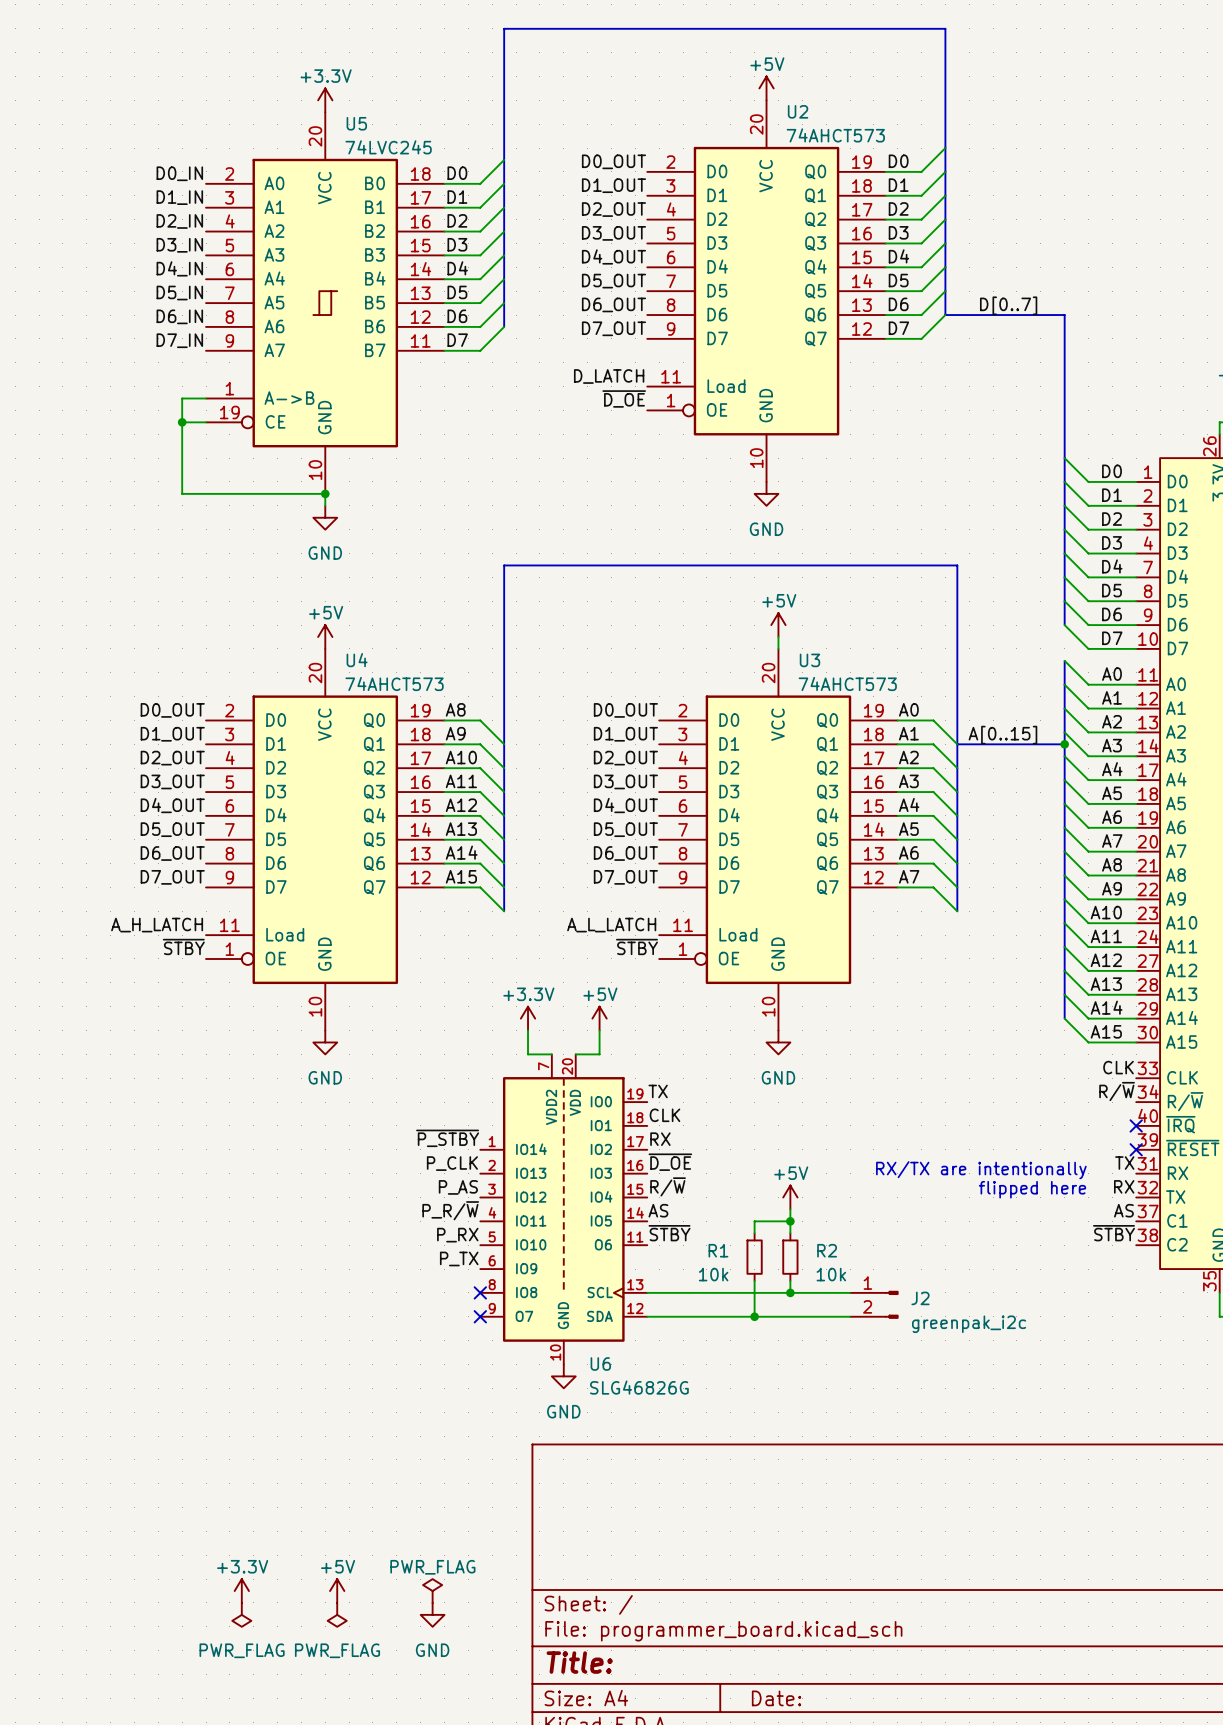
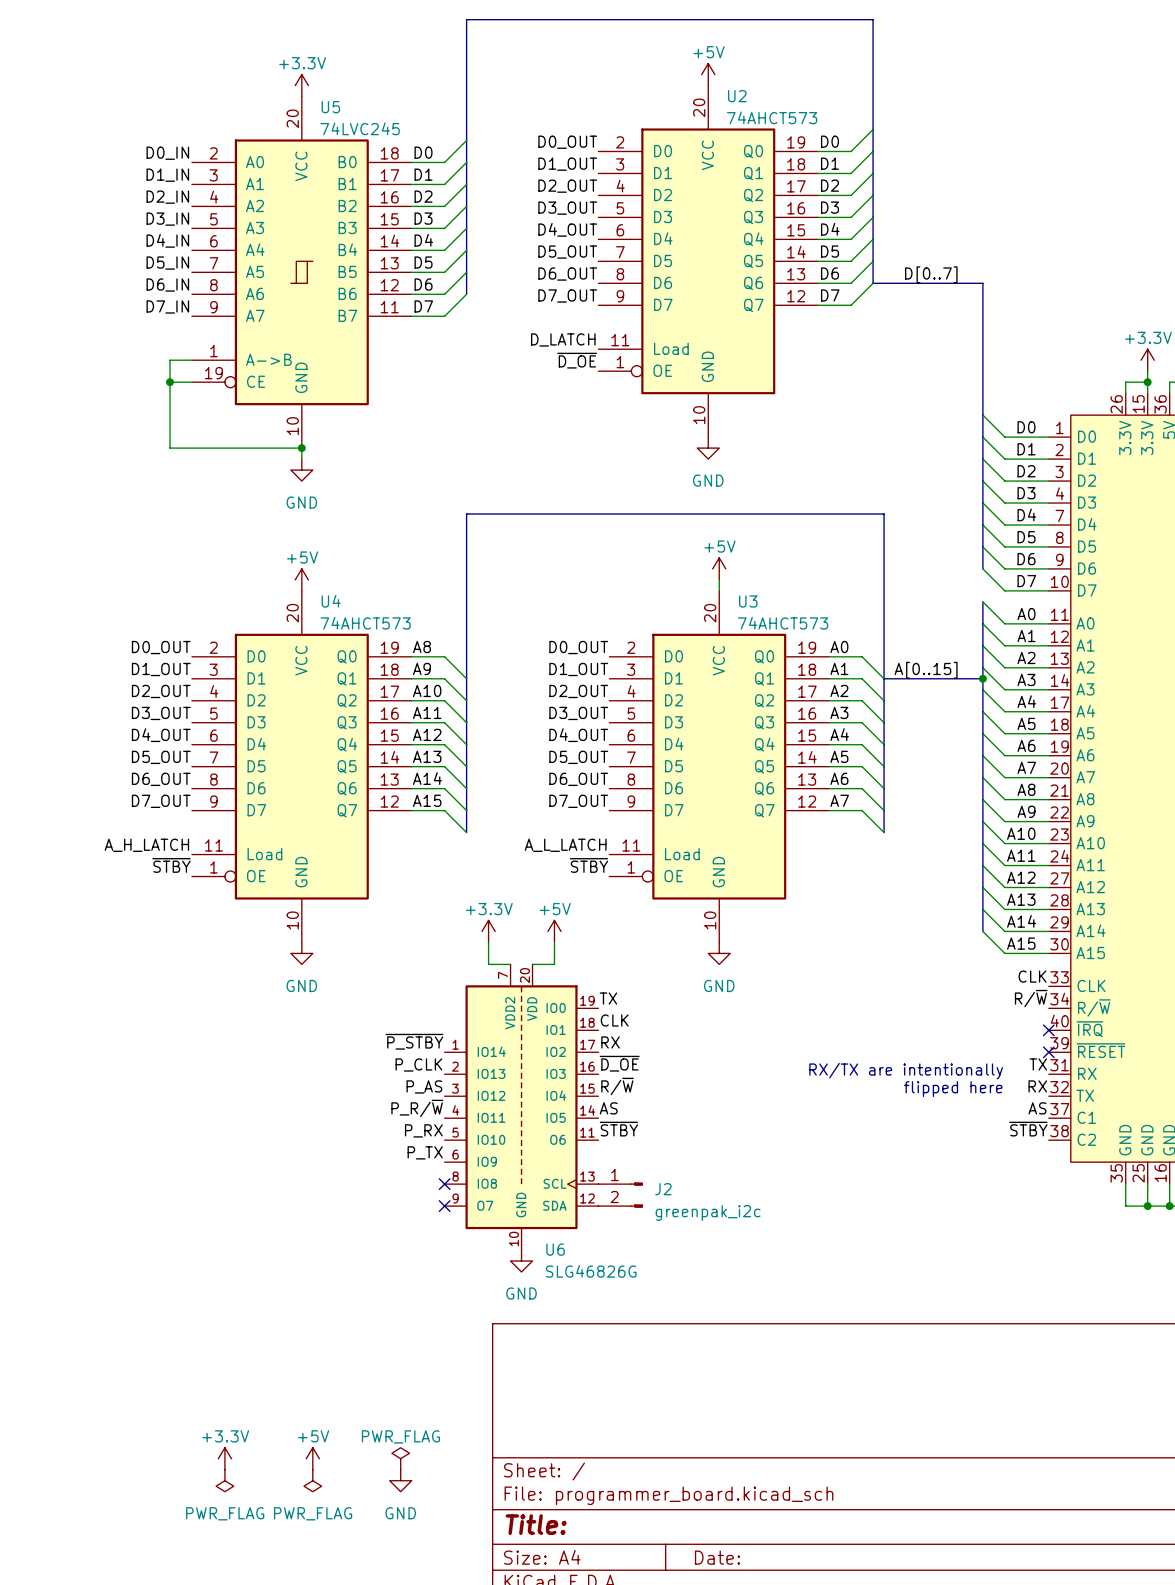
power symbol: +5V (790, 1197) -> none
wire: (790, 1209) (790, 1233) -> none
wire: (790, 1221) (754, 1221) (754, 1233) -> none
junction: (790, 1221) -> none
R1: 10k (754, 1257) -> none
R2: 10k (790, 1257) -> none
wire: (754, 1280) (754, 1316) -> none
wire: (790, 1280) (790, 1292) -> none
wire: (647, 1292) (850, 1292) -> none
junction: (790, 1292) -> none
J2 position: (874, 1304) -> (620, 1195)
wire: (647, 1316) (850, 1316) -> none
junction: (754, 1316) -> none

